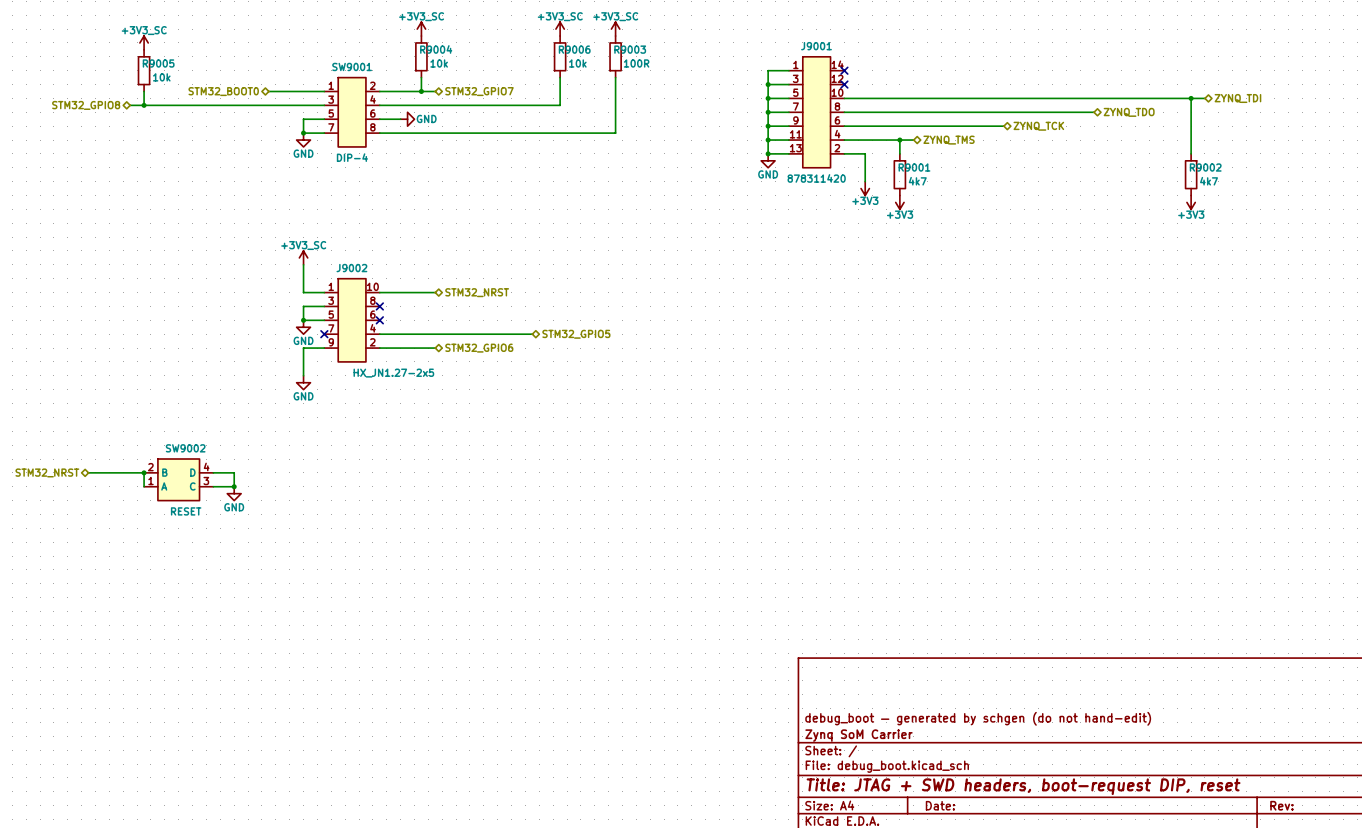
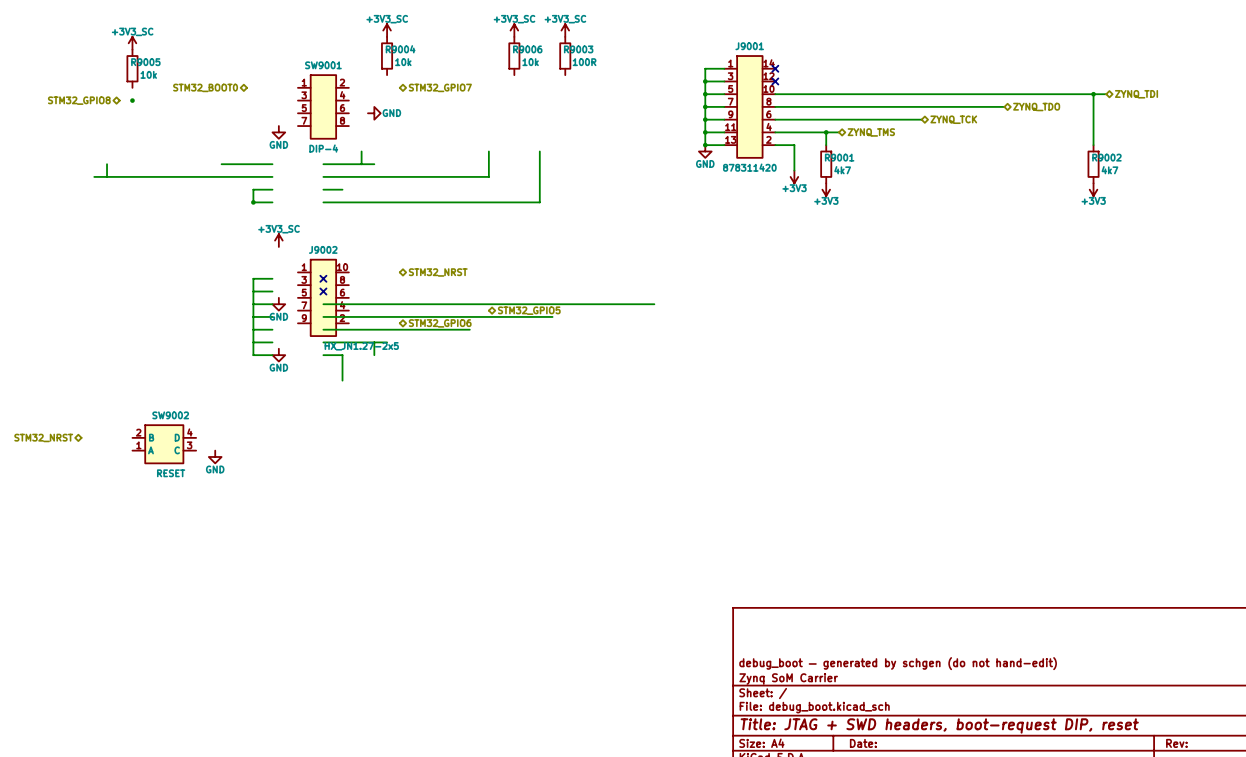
wire: (421, 77) (421, 91) -> (361, 151) (361, 164)
wire: (560, 77) (560, 105) (379, 105) -> (488, 151) (488, 176) (323, 176)
wire: (615, 77) (615, 133) (379, 133) -> (539, 151) (539, 202) (323, 202)
wire: (144, 91) (144, 105) -> (107, 164) (107, 176)
wire: (268, 91) (324, 91) -> (221, 164) (272, 164)
wire: (379, 91) (435, 91) -> (323, 164) (374, 164)
junction: (421, 91) -> none
wire: (130, 105) (324, 105) -> (94, 176) (272, 176)
wire: (324, 119) (303, 119) (303, 133) (324, 133) -> (272, 189) (253, 189) (253, 202) (272, 202)
wire: (379, 119) (400, 119) -> (323, 189) (342, 189)
junction: (303, 133) -> none
junction: none -> (253, 202)
wire: (303, 264) (303, 292) (324, 292) -> none
wire: (379, 292) (435, 292) -> none
wire: none -> (272, 278) (253, 278) (253, 355) (272, 355)
no-connect mark: none -> (323, 278)
wire: (324, 306) (303, 306) (303, 320) (324, 320) -> none
no-connect mark: (379, 306) -> none
wire: none -> (253, 291) (272, 291)
no-connect mark: none -> (323, 291)
junction: (303, 320) -> none
no-connect mark: (379, 320) -> none
wire: none -> (253, 304) (272, 304)
wire: none -> (323, 304) (654, 304)
no-connect mark: (324, 334) -> none
wire: (379, 334) (532, 334) -> none
wire: none -> (253, 316) (272, 316)
wire: none -> (323, 316) (552, 316)
wire: (324, 348) (303, 348) (303, 375) -> none
wire: (379, 348) (435, 348) -> none
wire: none -> (253, 329) (272, 329)
wire: none -> (323, 329) (469, 329)
wire: none -> (253, 342) (272, 342)
wire: none -> (323, 342) (387, 342)
wire: none -> (374, 342) (374, 355)
wire: none -> (323, 355) (342, 355) (342, 380)
wire: (88, 472) (144, 472) (144, 486) -> none
junction: (144, 472) -> none
wire: (213, 472) (234, 472) (234, 486) (213, 486) -> none
junction: (234, 486) -> none

